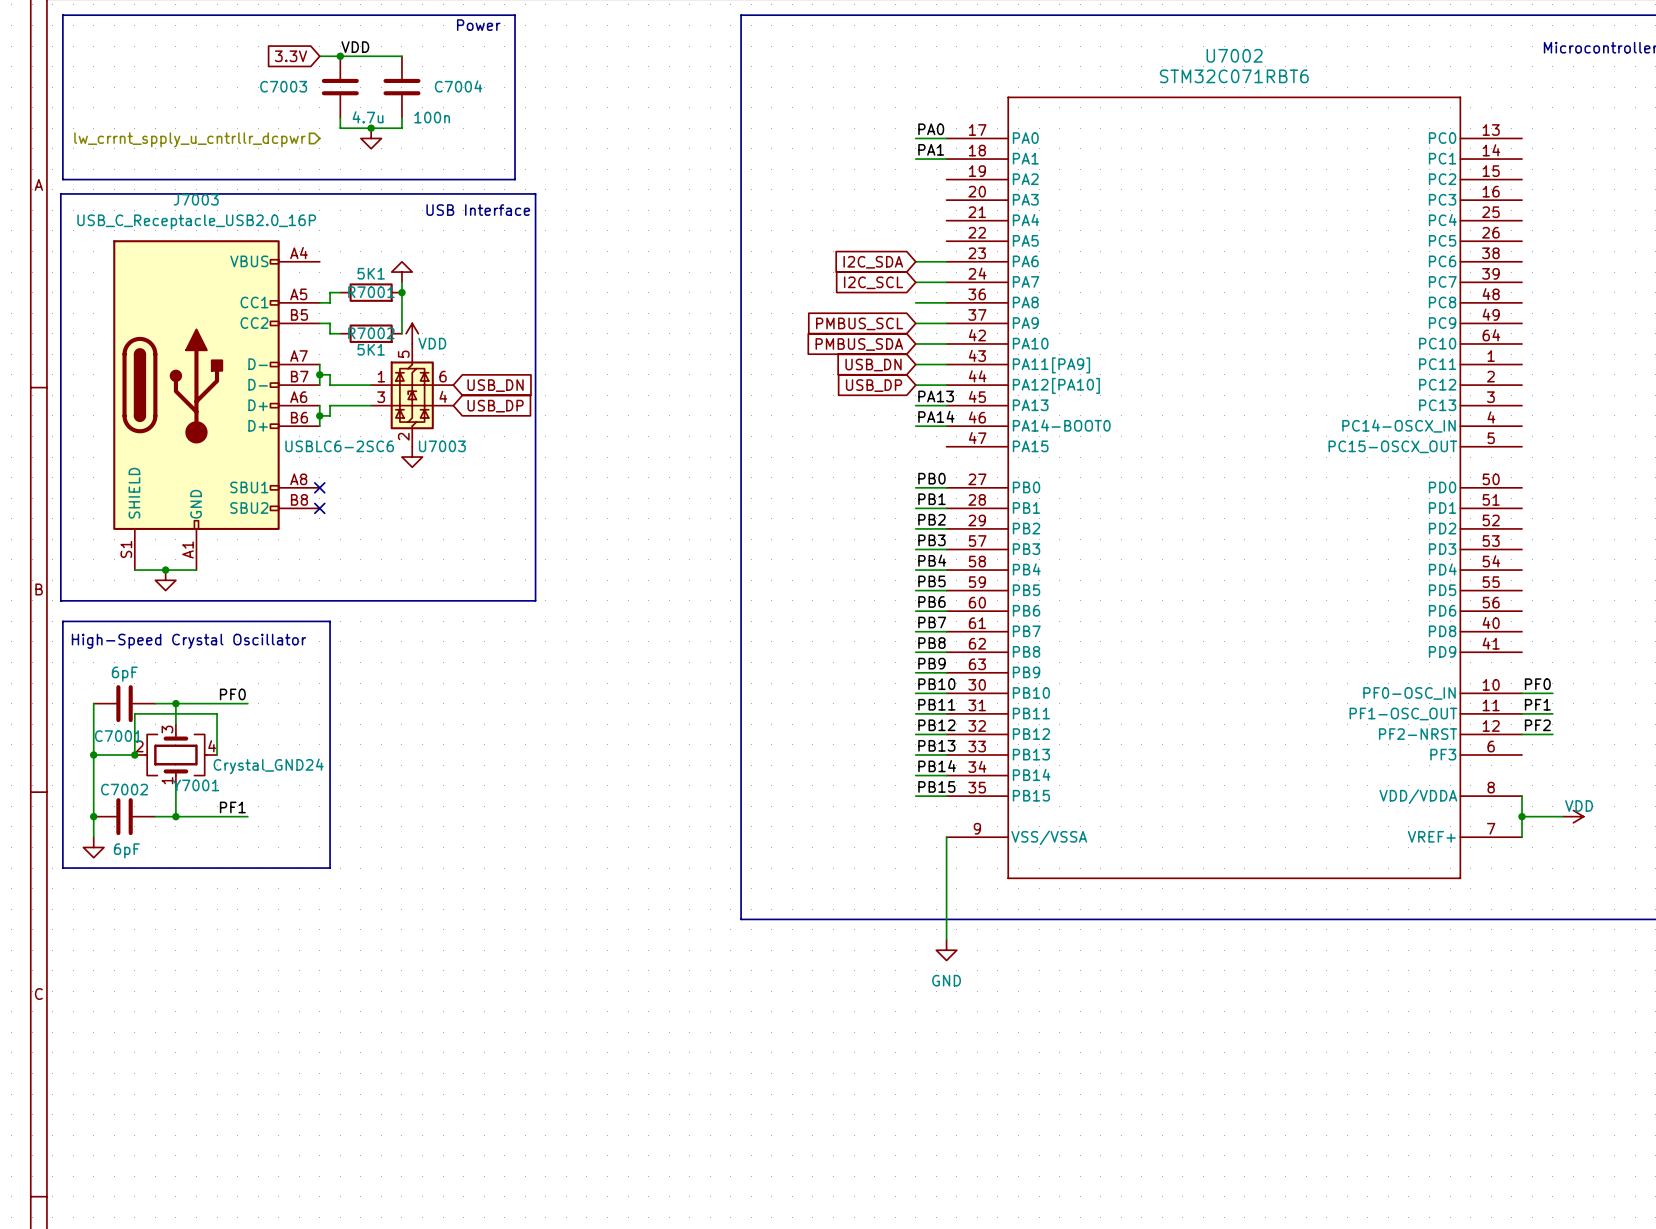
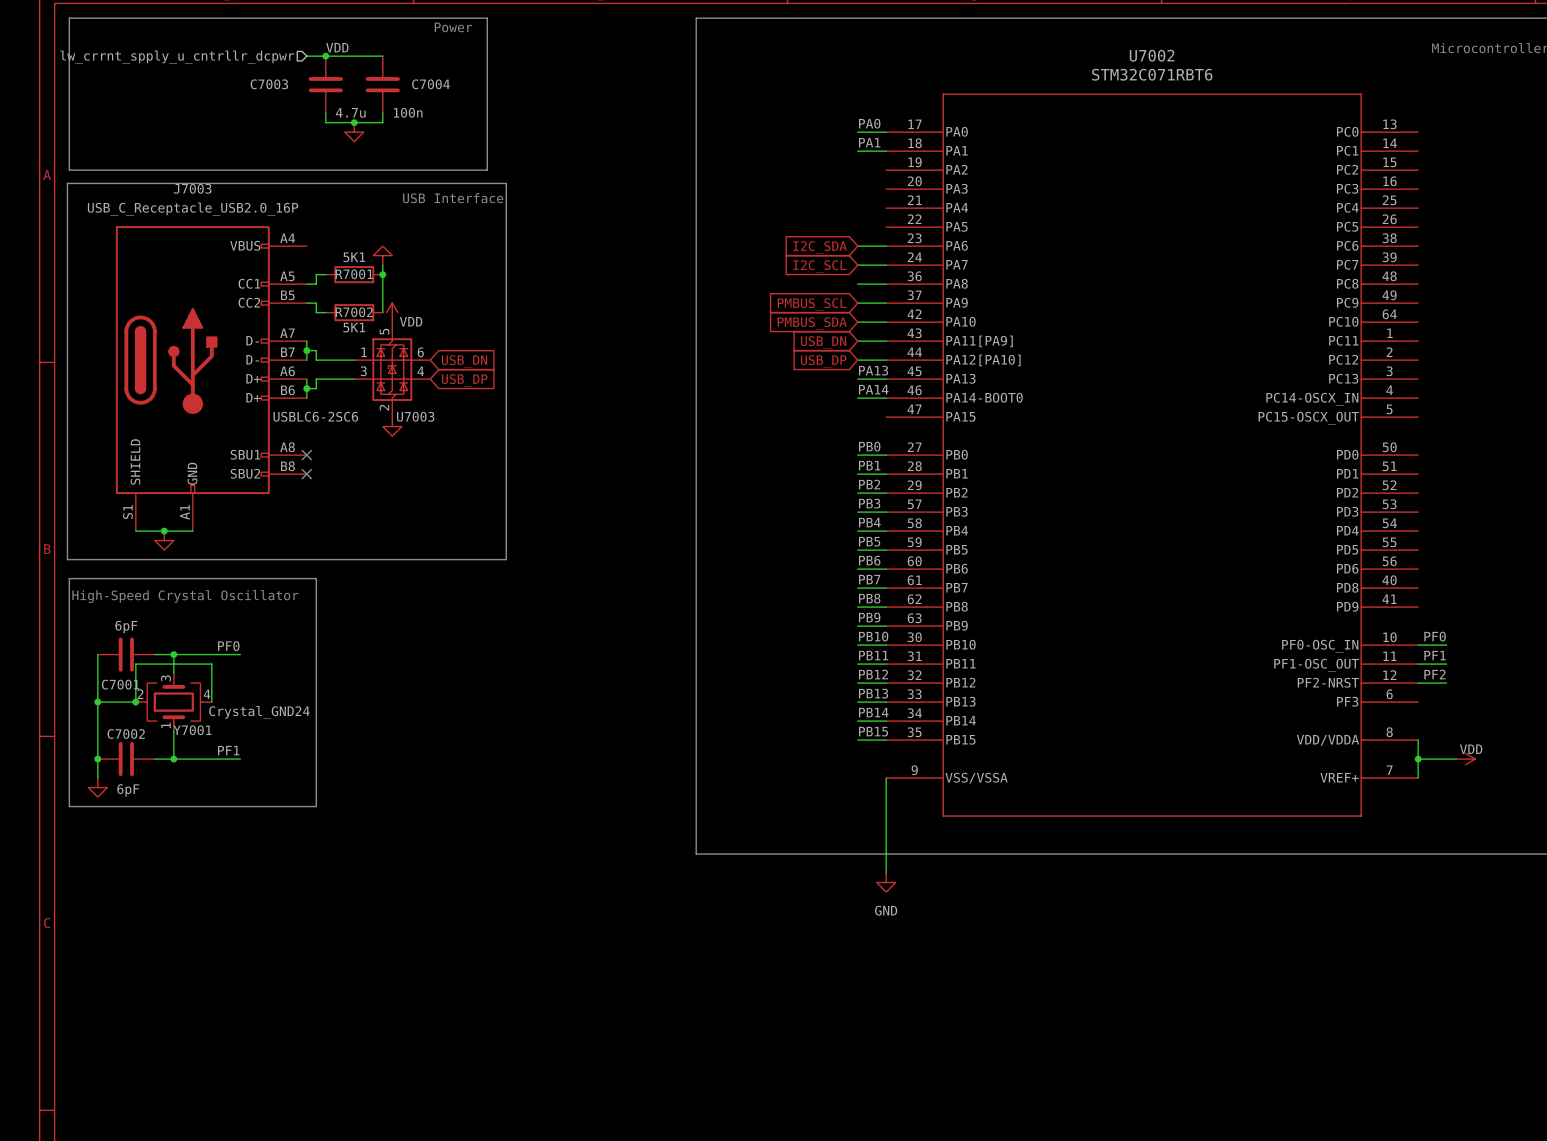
global label: 3.3V (291, 56) -> none
hierarchical label position: lw_crrnt_spply_u_cntrllr_dcpwr (189, 139) -> lw_crrnt_spply_u_cntrllr_dcpwr (177, 57)

